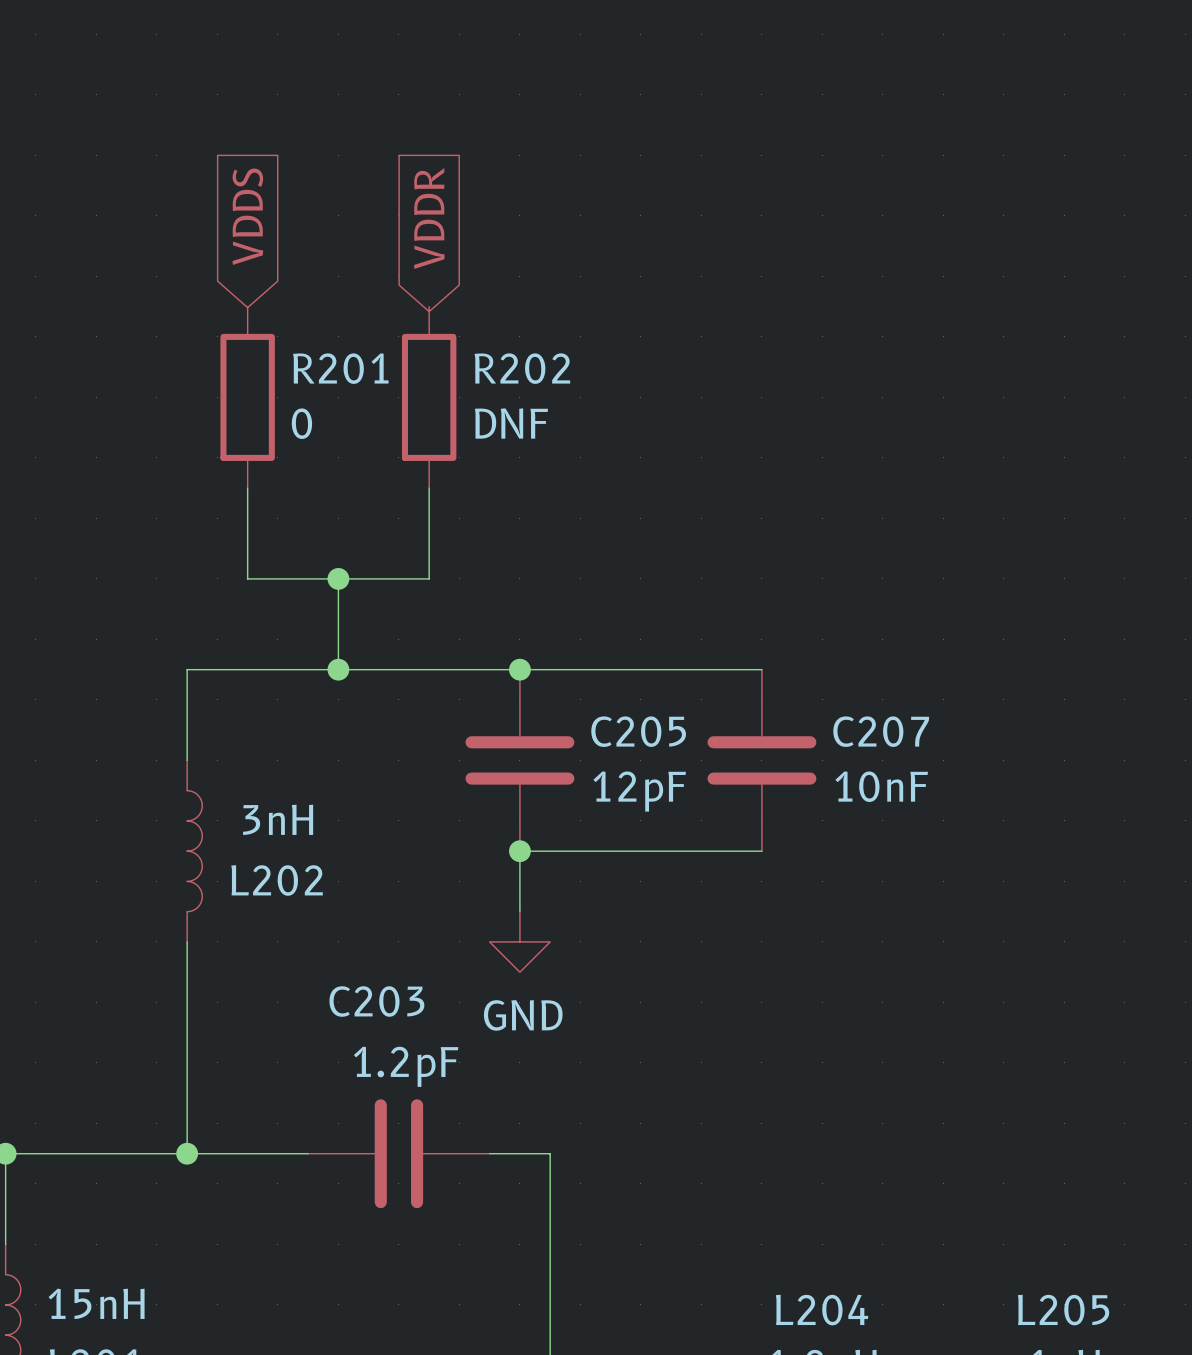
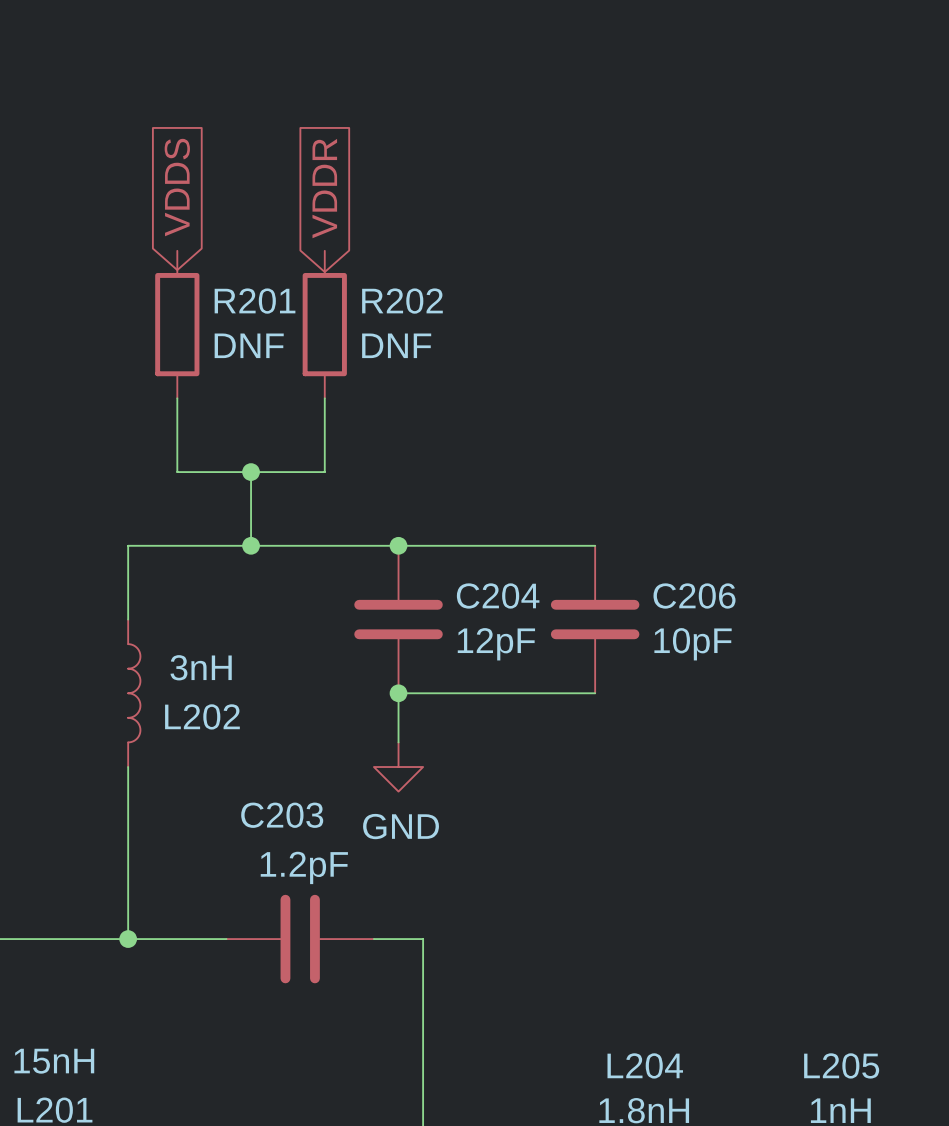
R201 value: 0 (301, 423) -> DNF (249, 345)
C205 name: C205 (638, 731) -> C204 (498, 596)
C207 name: C207 (881, 731) -> C206 (694, 596)
C207 value: 10nF (881, 786) -> 10pF (693, 644)

